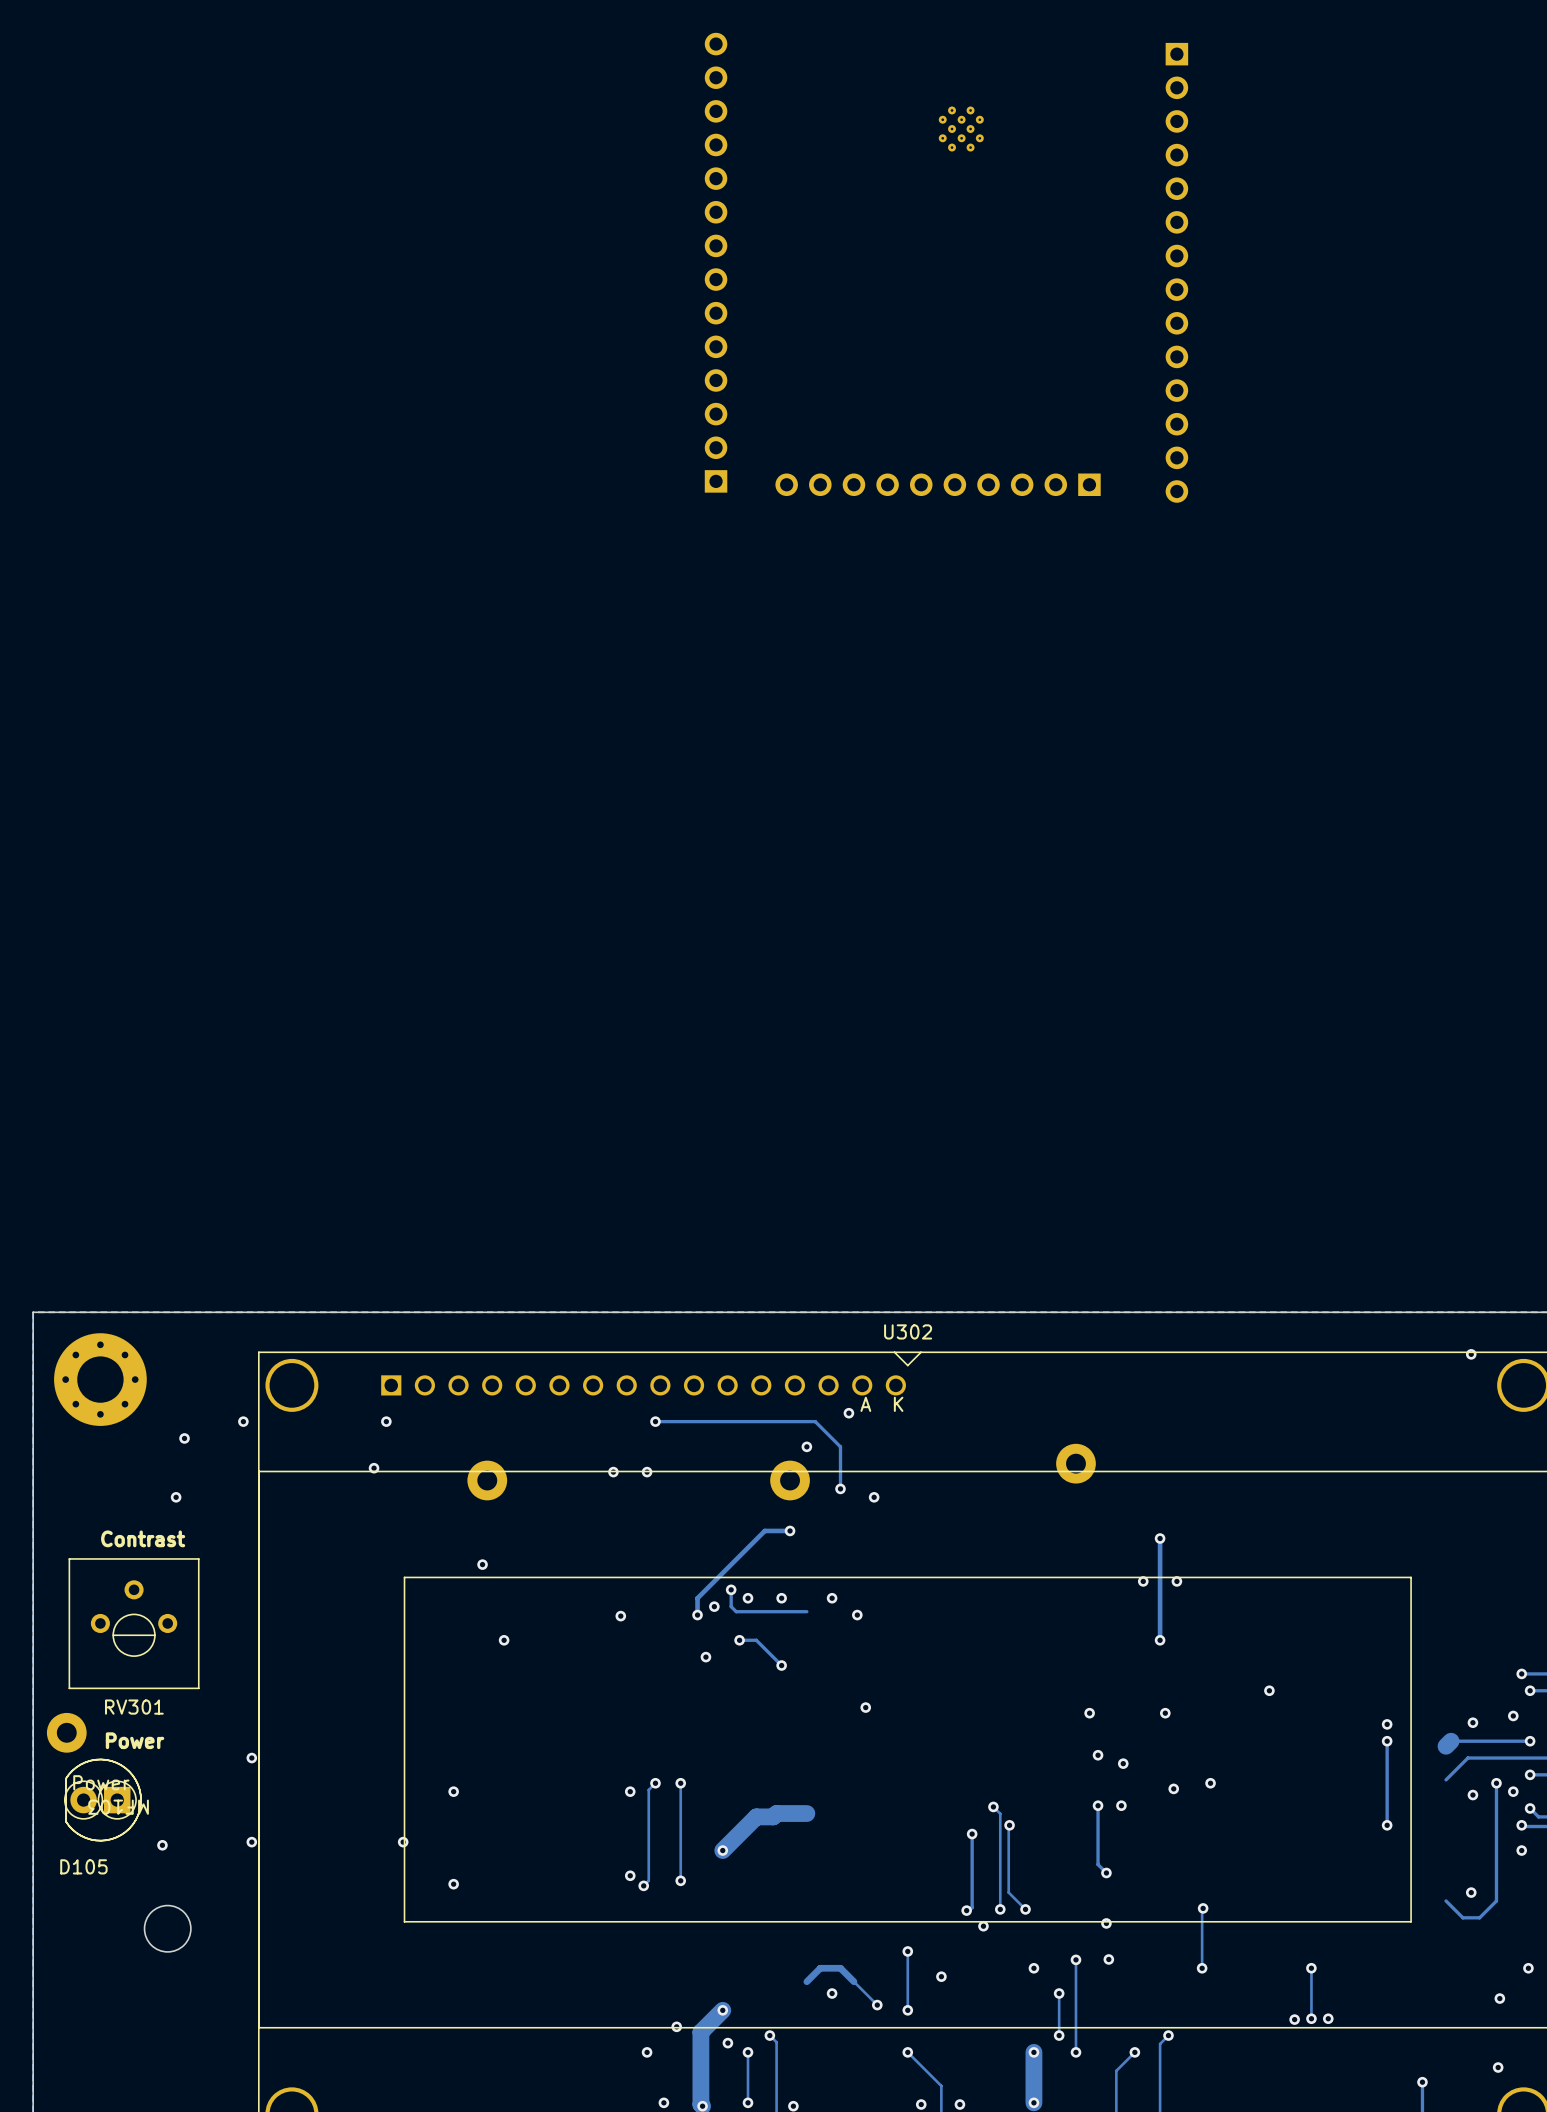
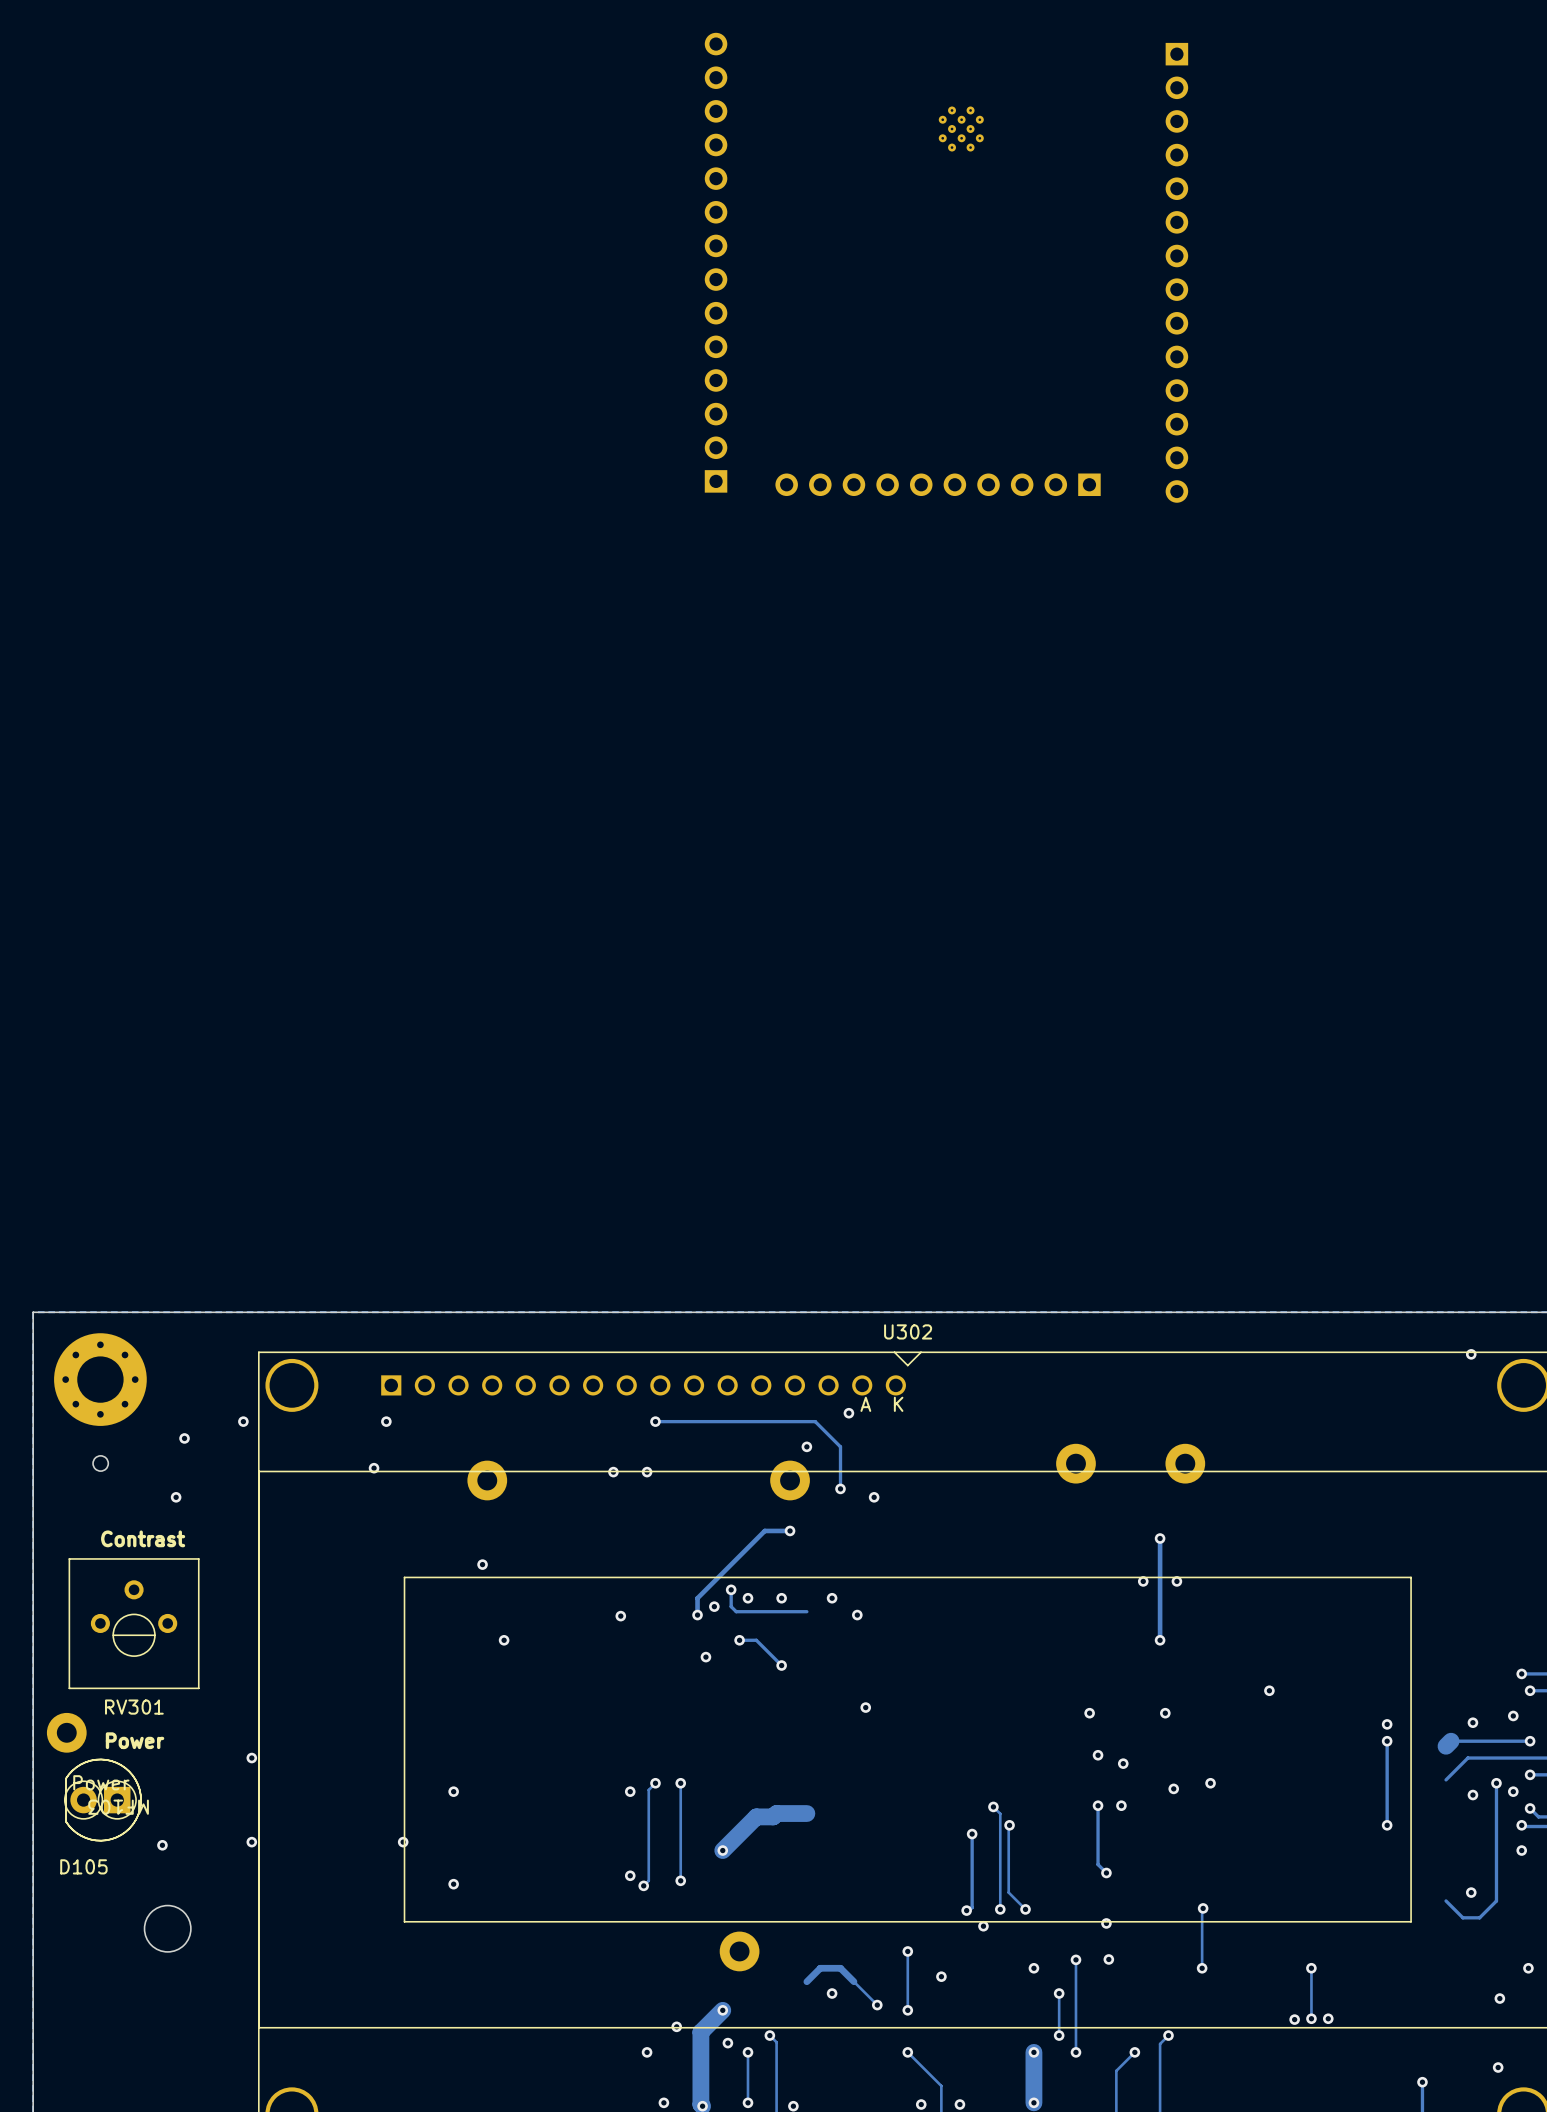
drawing: none -> [92, 1455, 110, 1472]
part: none -> (1185, 1463)
part: none -> (739, 1951)

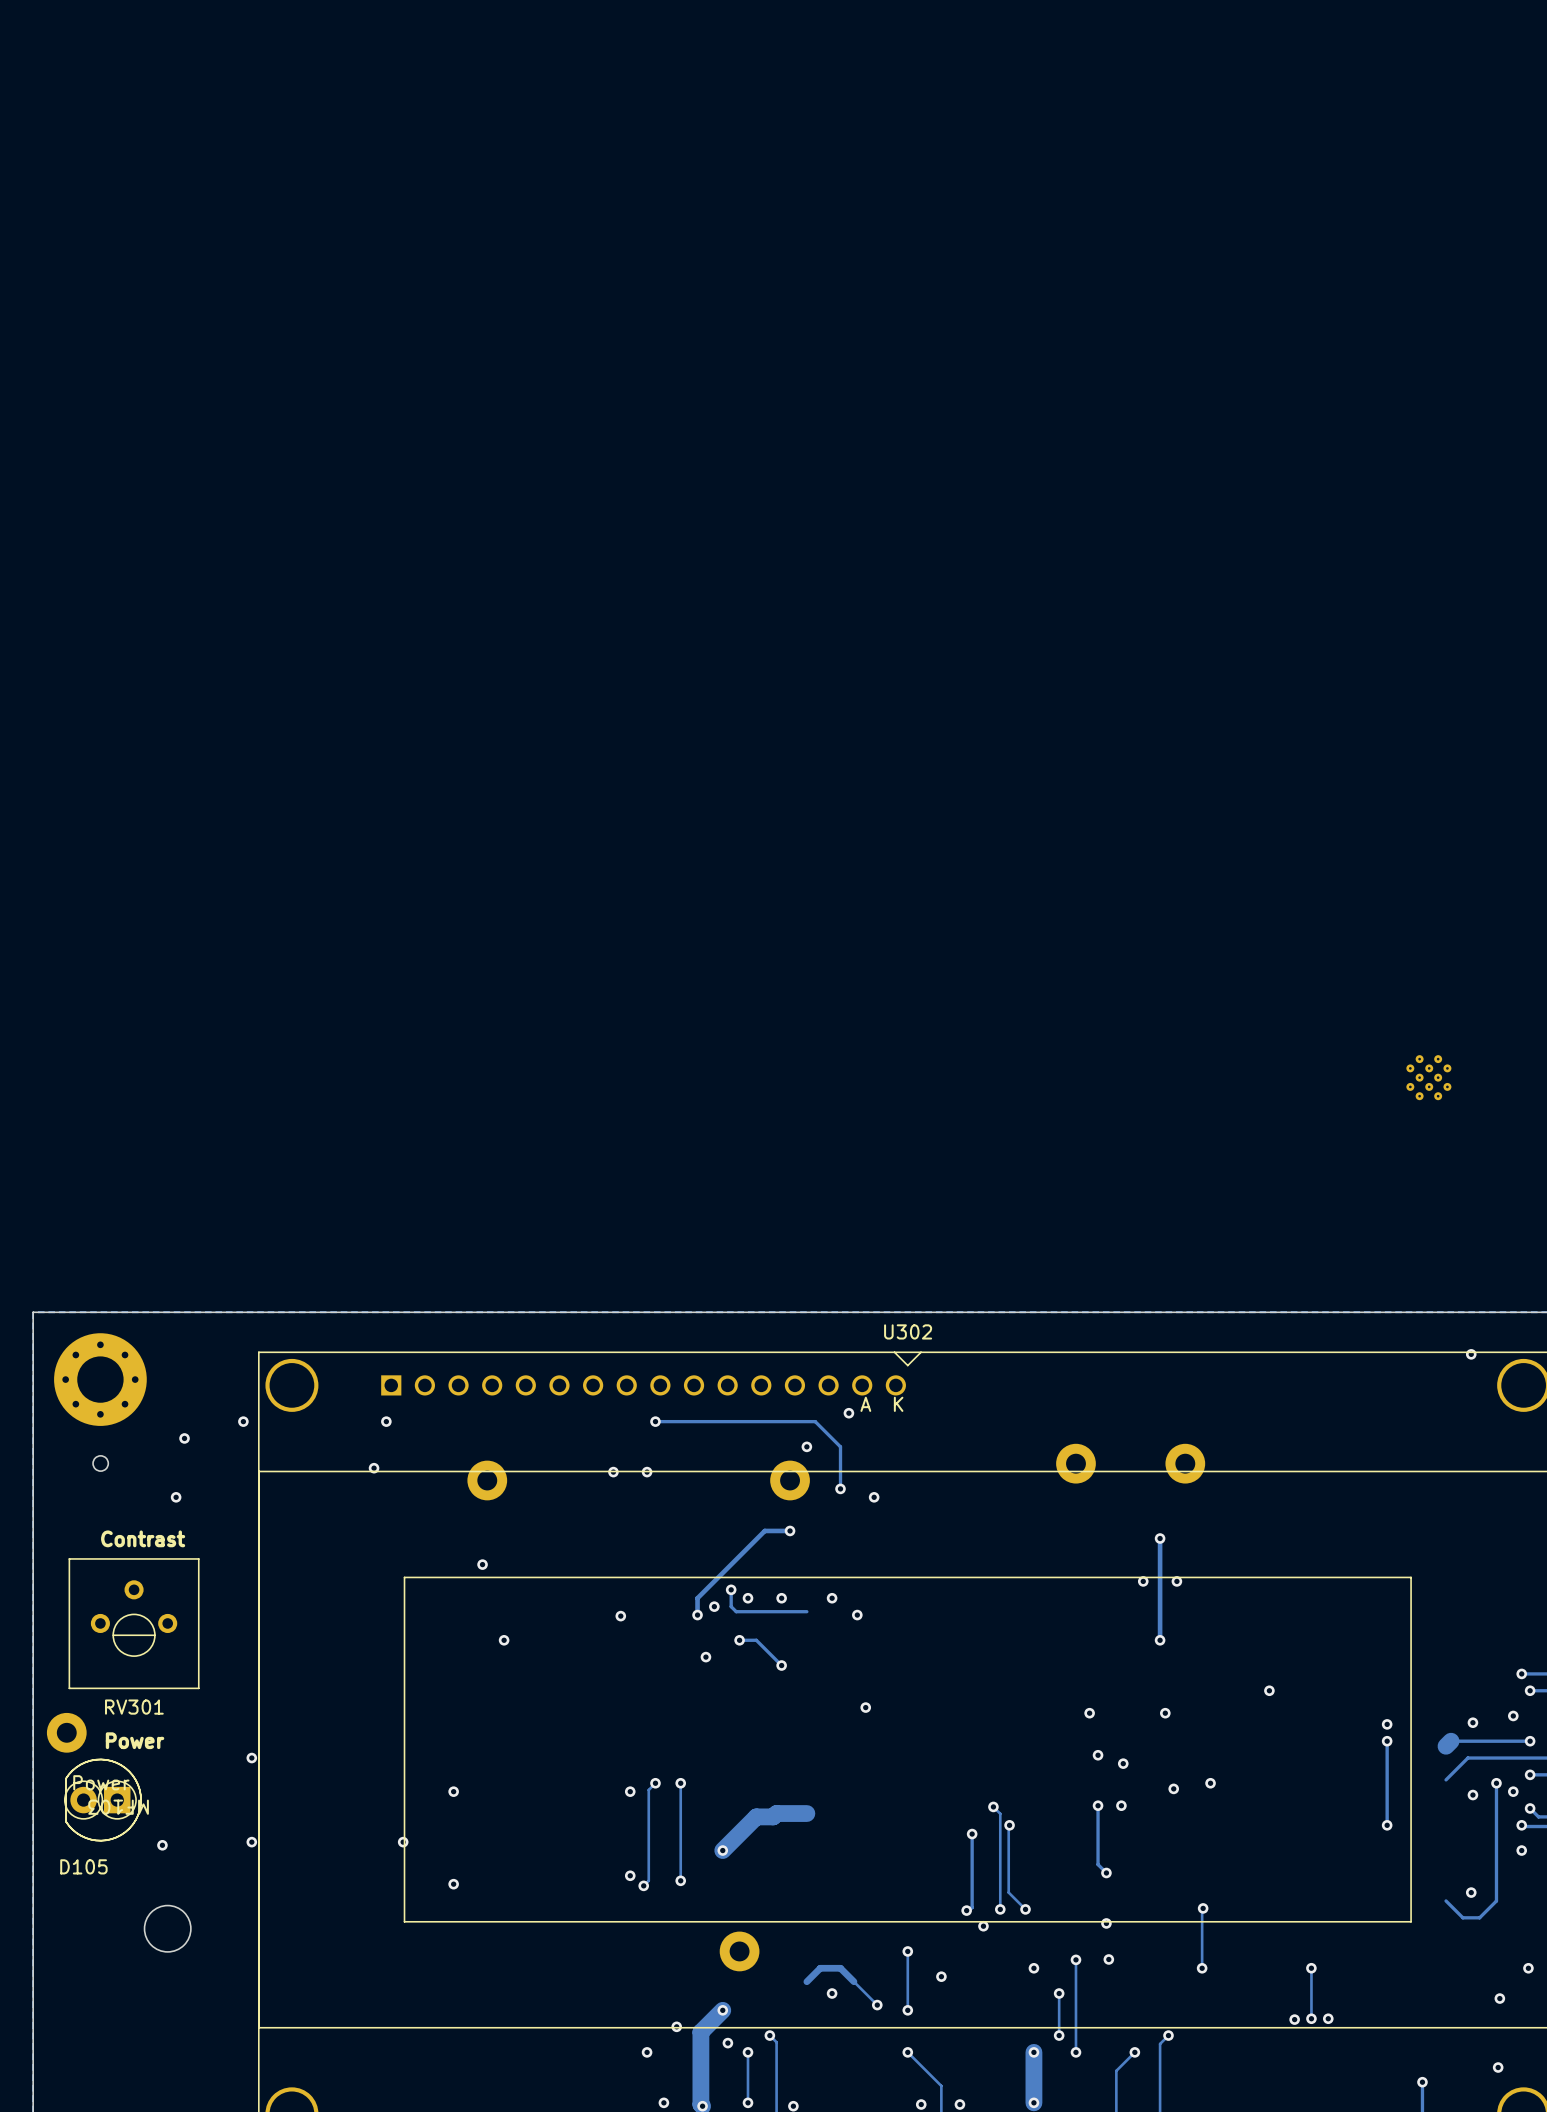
part: (961, 129) -> none
part: (716, 262) -> none
part: (1176, 272) -> none
part: (938, 484) -> none
part: none -> (1428, 1077)

